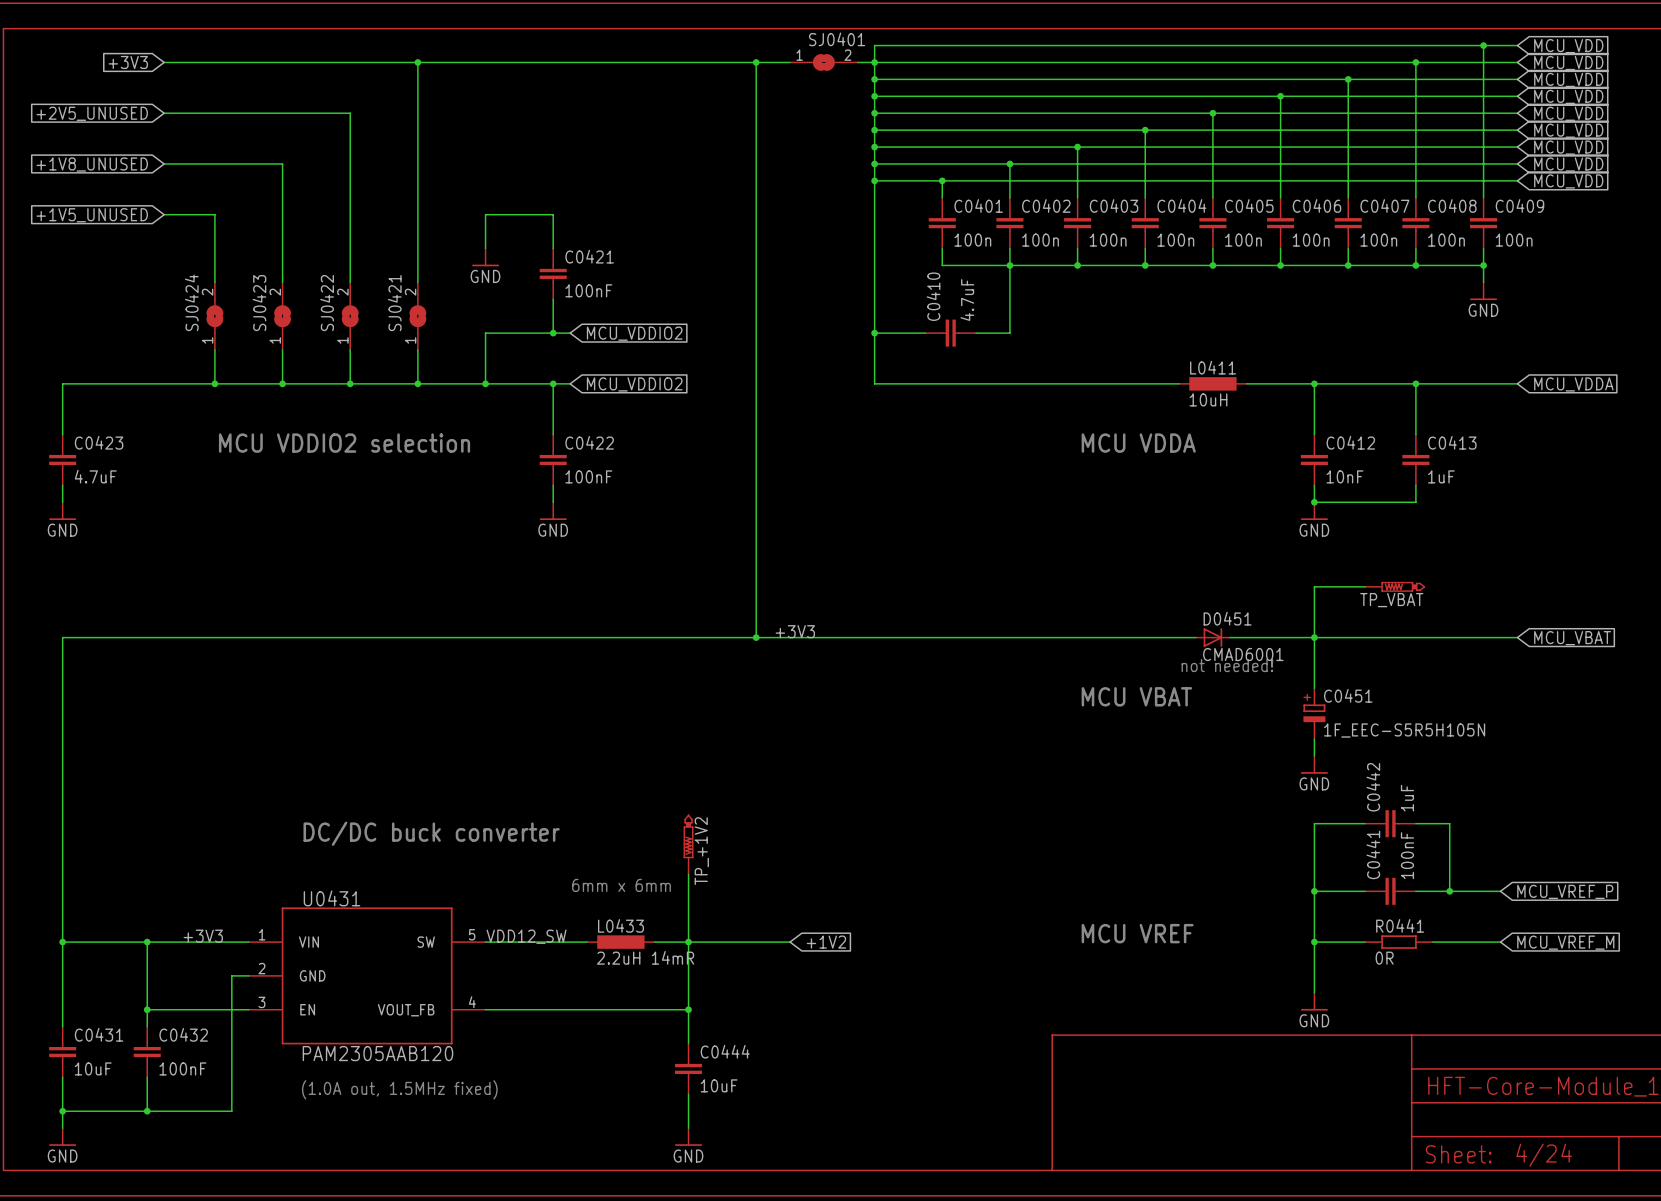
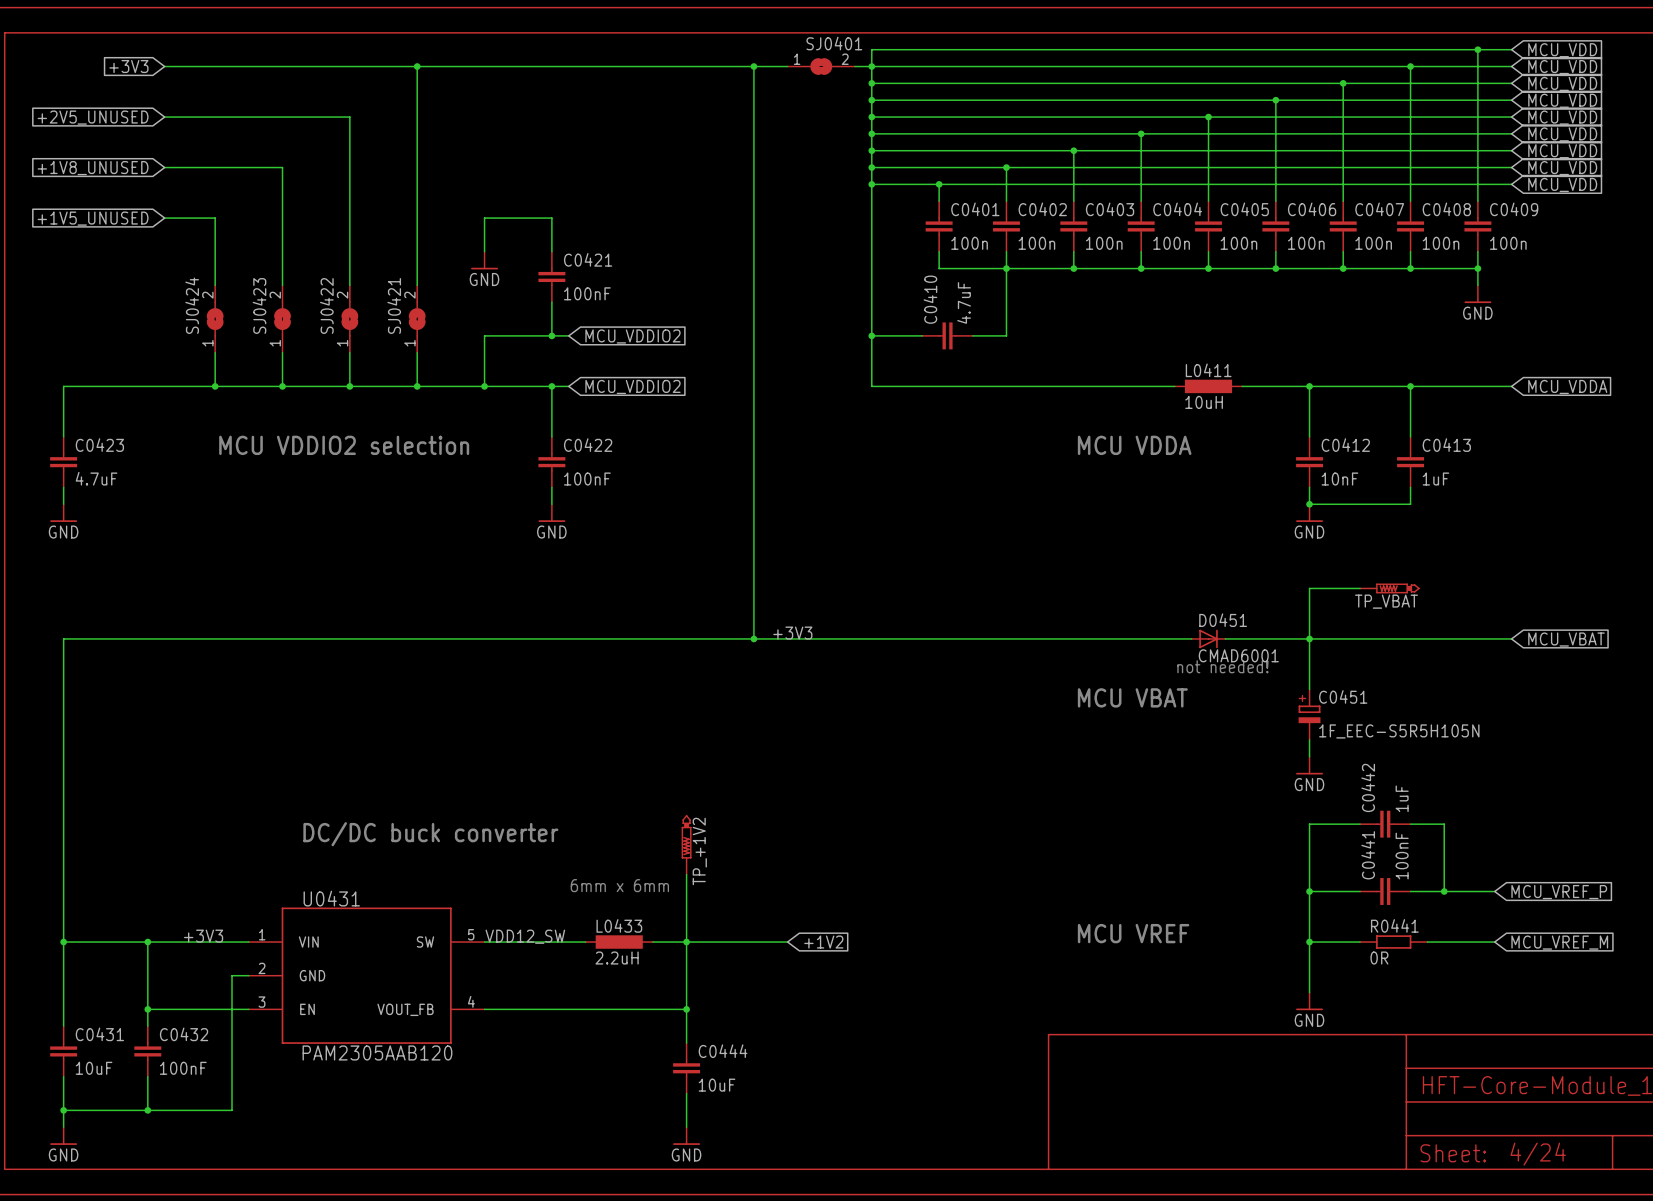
L0433 value: 2.2uH 14mR (645, 957) -> 2.2uH (617, 958)
text: (1.0A out, 1.5MHz fixed) (399, 1089) -> none

